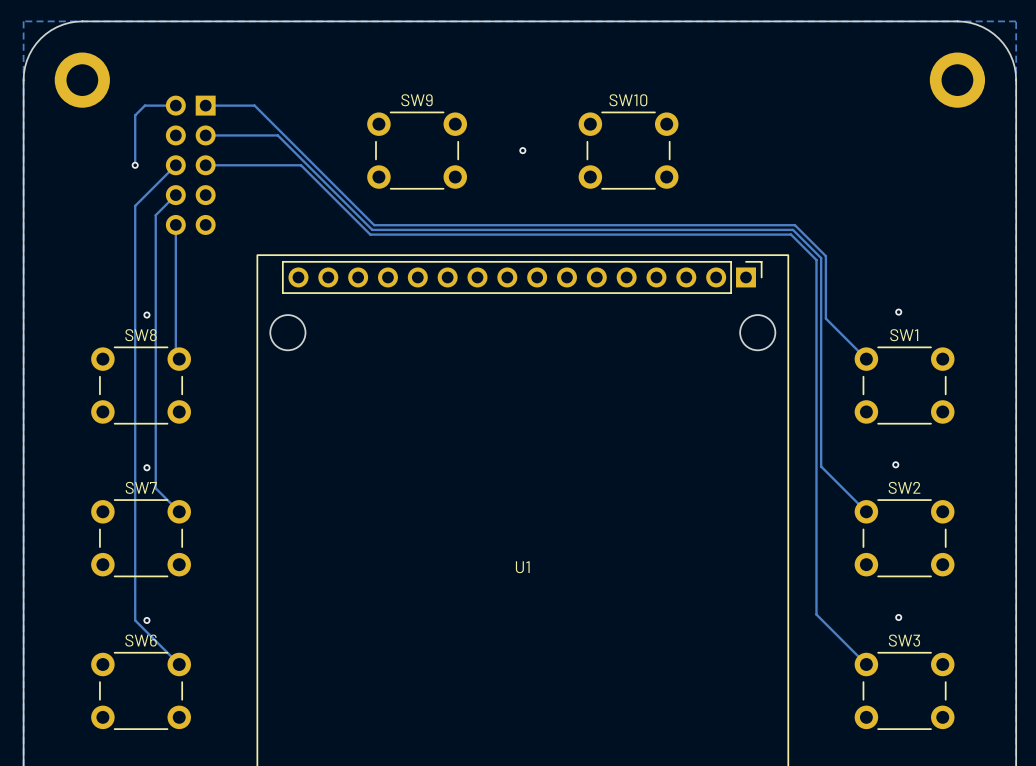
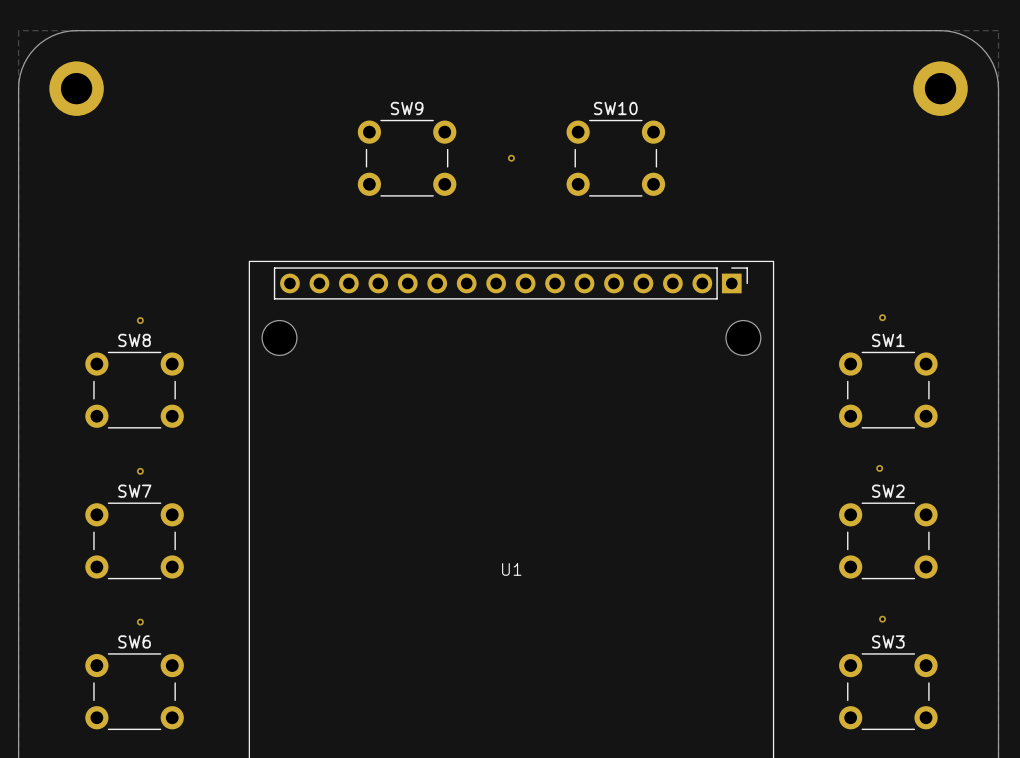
track: (175, 105) (144, 105) (135, 115) (135, 165) -> none
track: (205, 105) (254, 105) (374, 225) (794, 225) (825, 256) (825, 318) (866, 359) -> none
track: (205, 135) (277, 135) (372, 229) (792, 229) (821, 258) (821, 466) (866, 511) -> none
via: (135, 165) -> none
track: (175, 165) (135, 205) (135, 620) (179, 664) -> none
part: (190, 165) -> none
track: (205, 165) (301, 165) (370, 234) (791, 234) (816, 260) (816, 614) (866, 664) -> none
track: (175, 195) (155, 215) (155, 488) (179, 511) -> none
track: (175, 224) (175, 355) (179, 359) -> none

